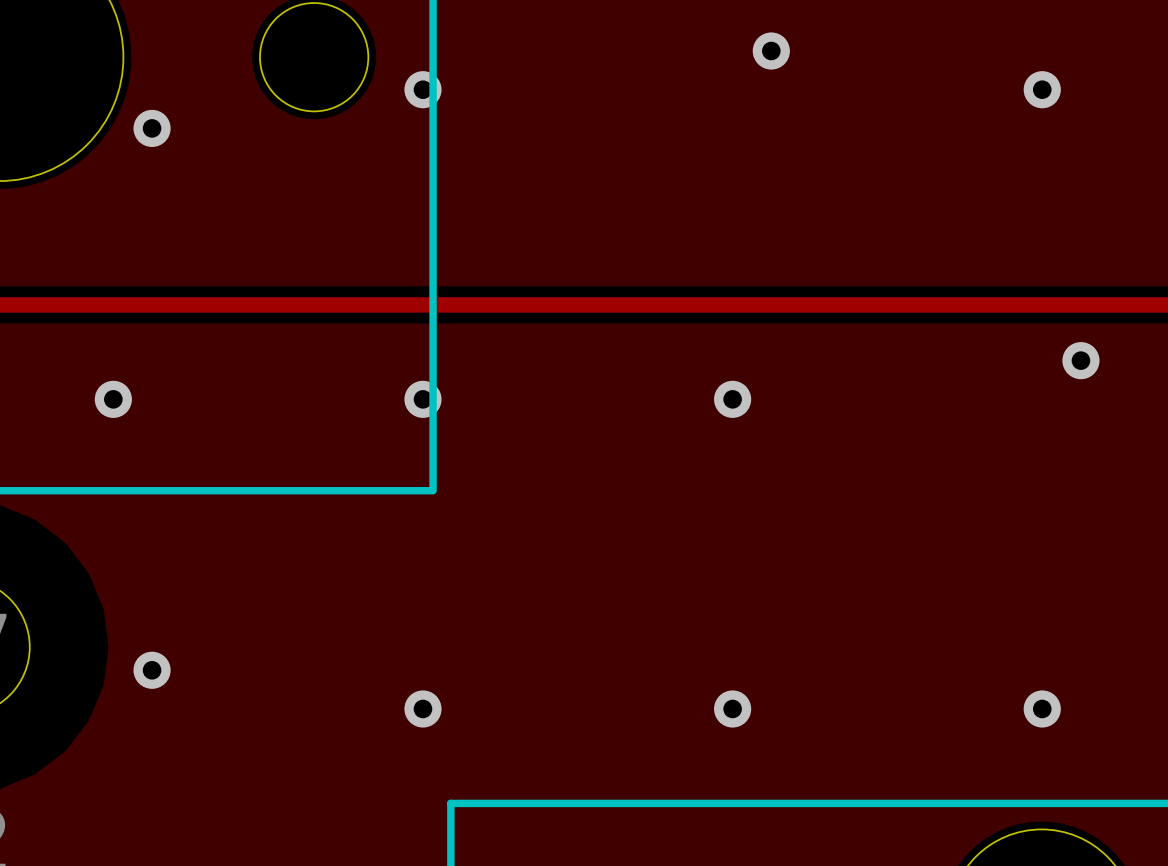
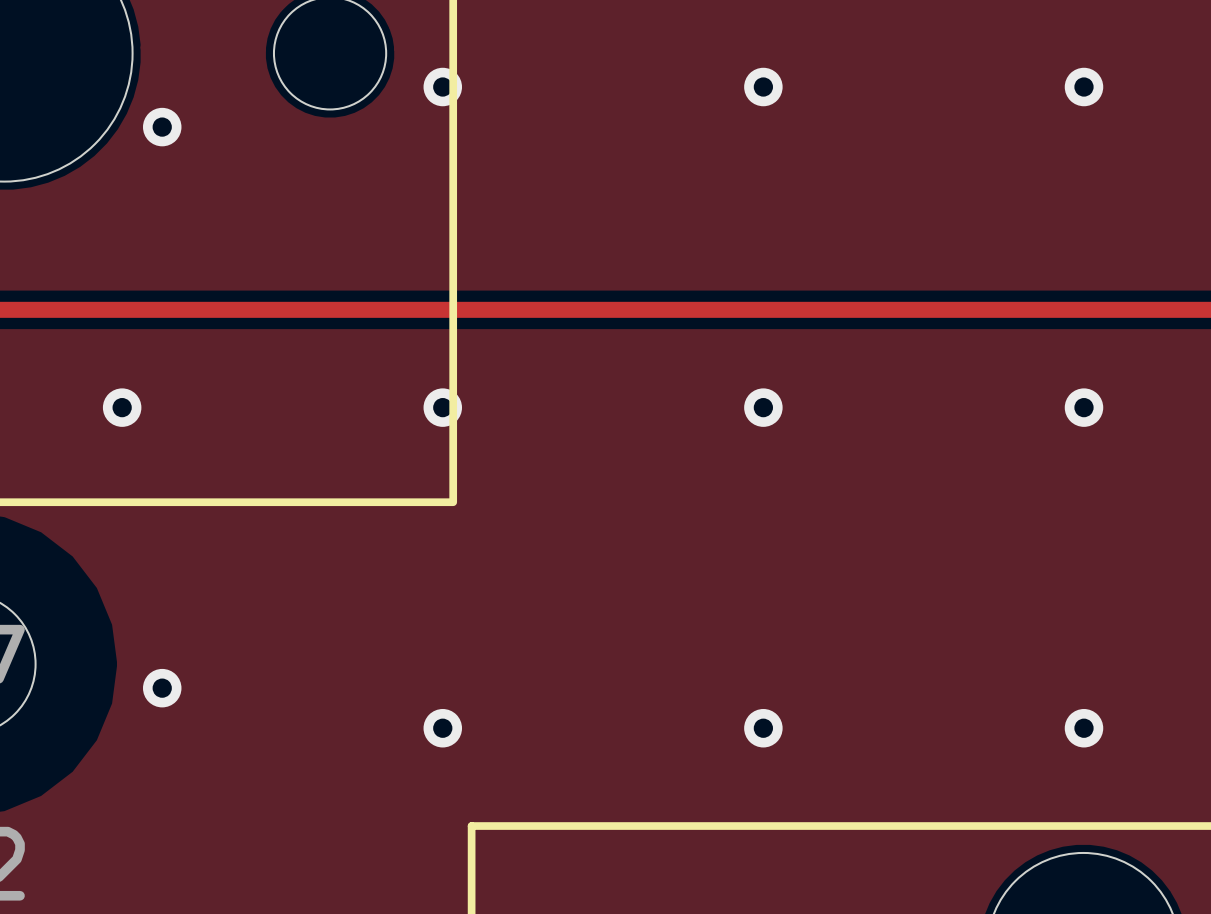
via position: (771, 51) -> (763, 87)
via position: (1080, 360) -> (1083, 407)

